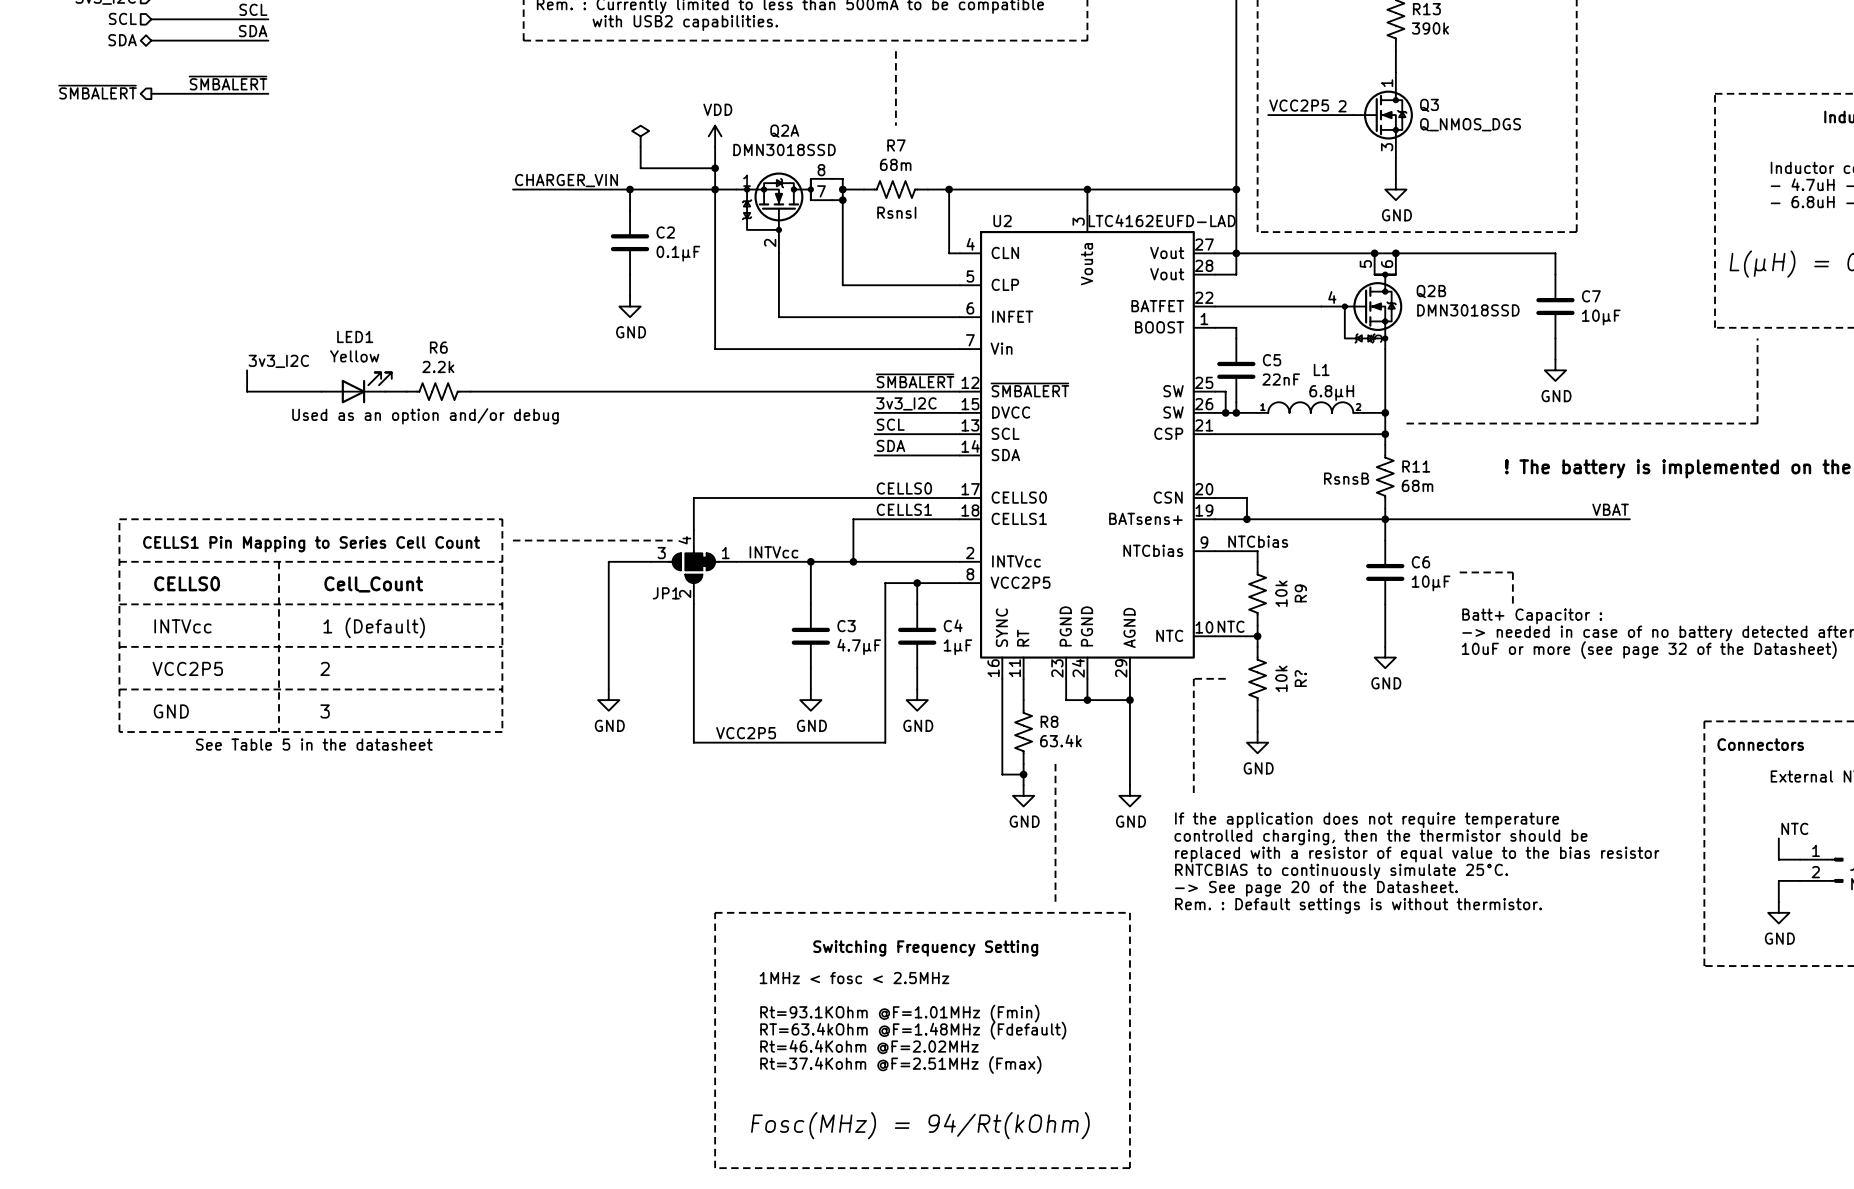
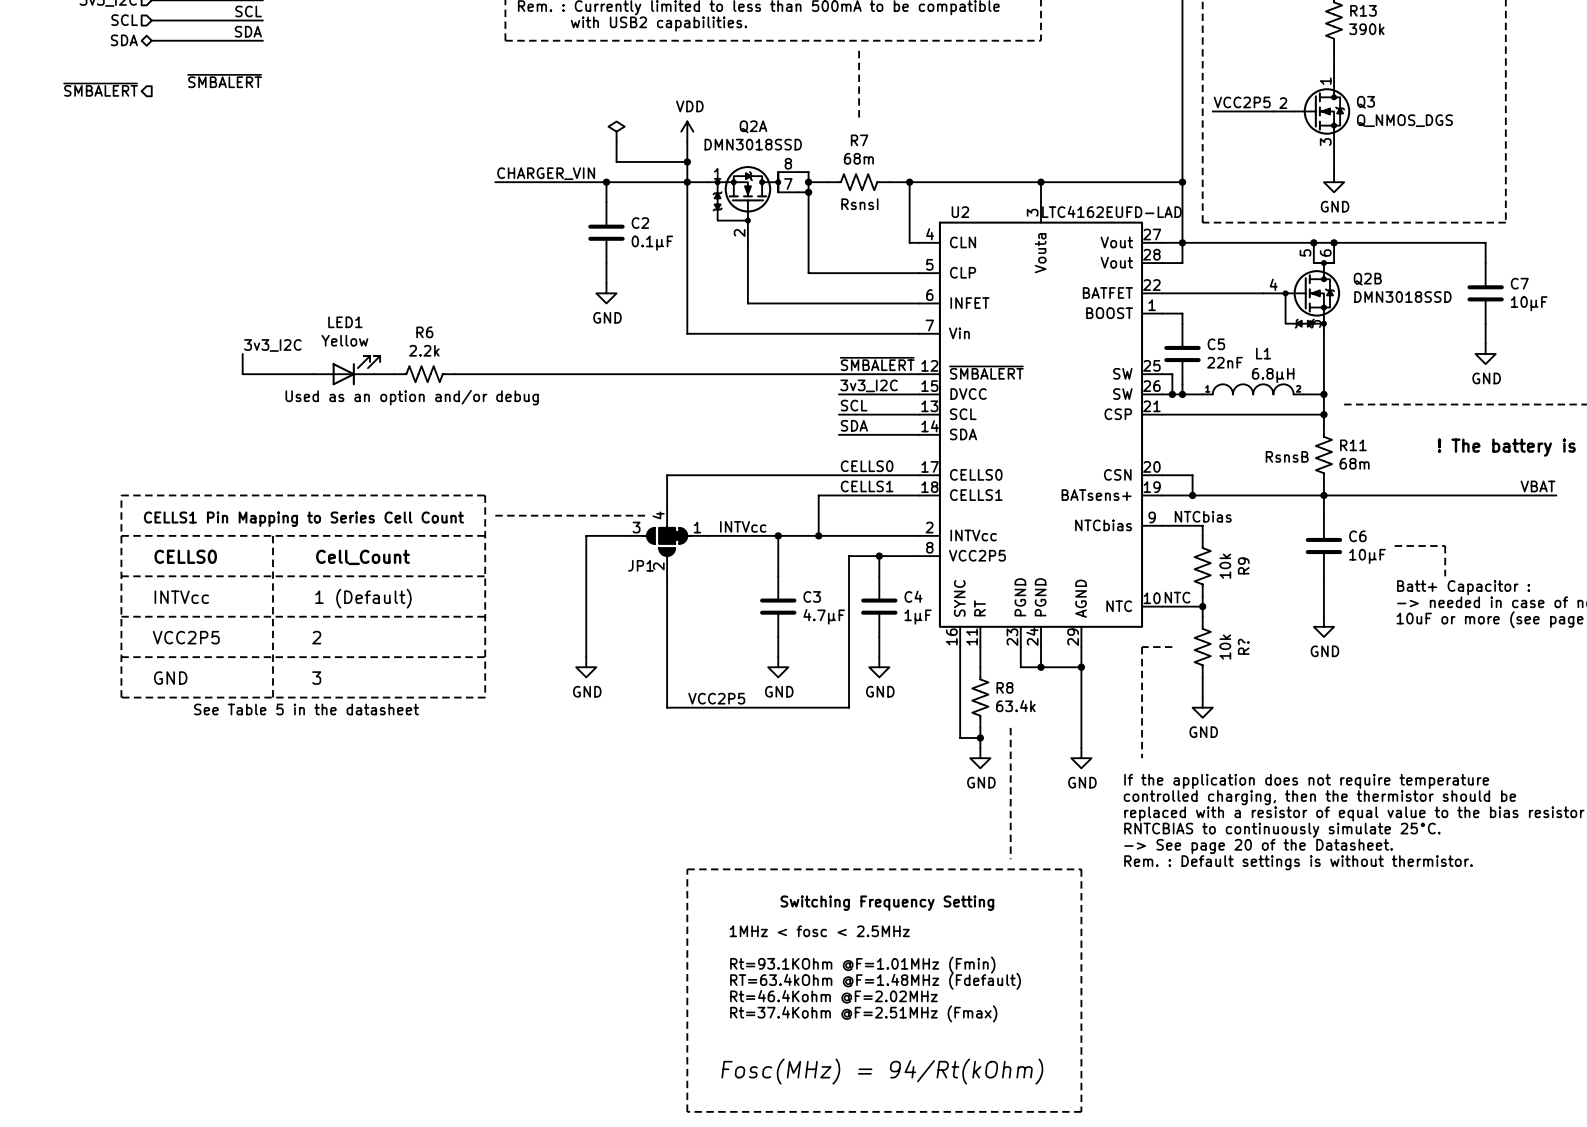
wire: (151, 93) (268, 93) -> none

